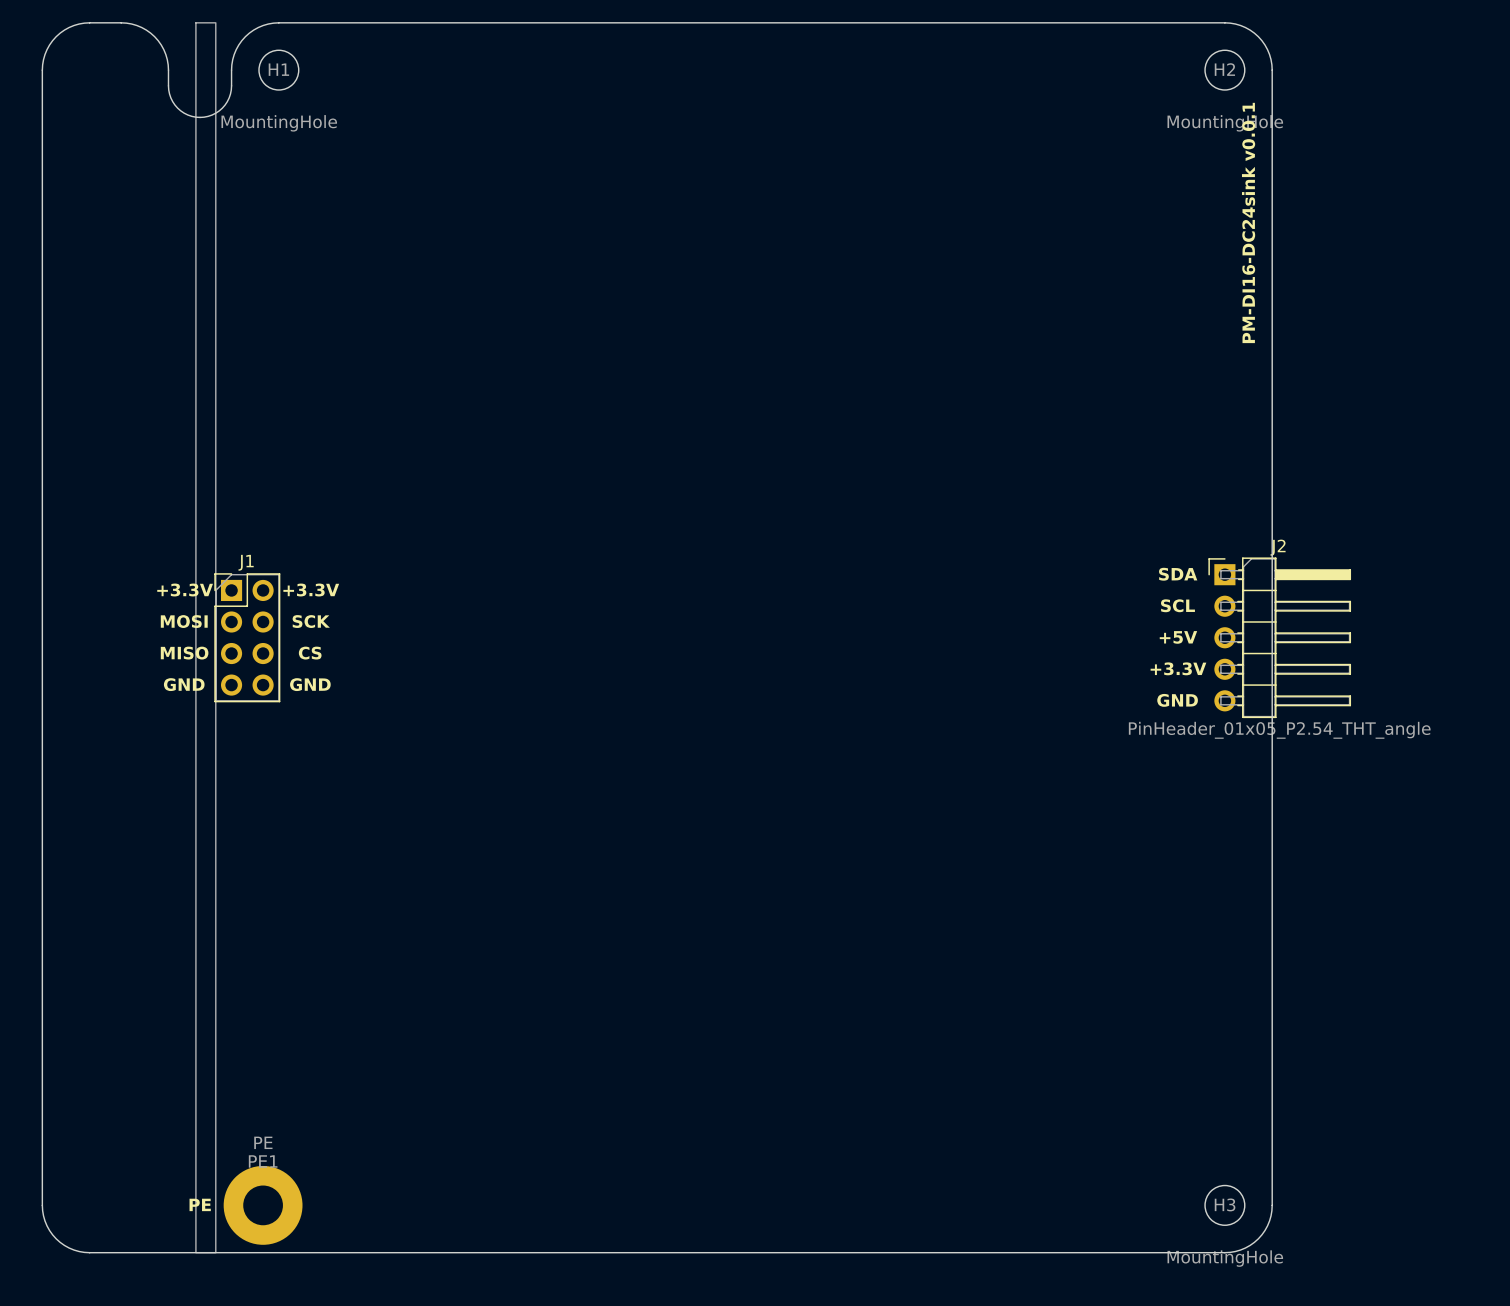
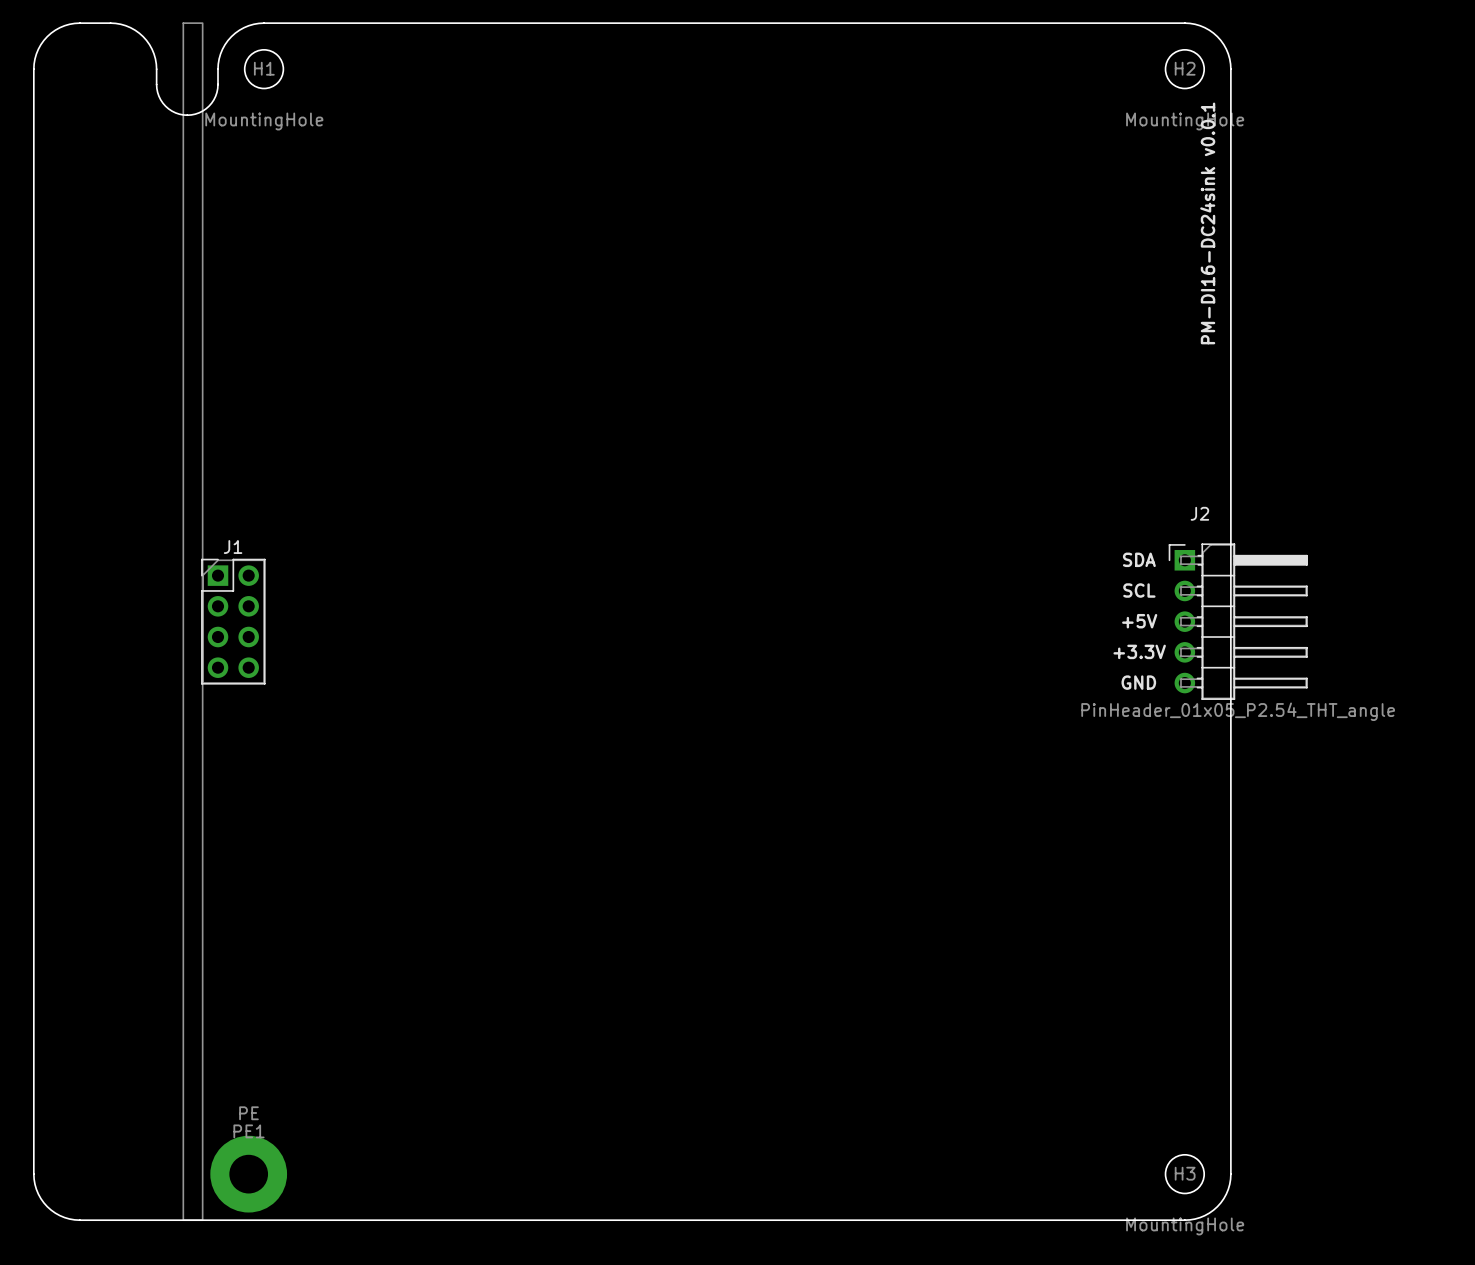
J2 name position: J2 (1278, 547) -> J2 (1199, 513)
text: +3.3V (185, 590) -> none
text: +3.3V (311, 590) -> none
text: MOSI (184, 621) -> none
text: SCK (311, 621) -> none
text: MISO (184, 653) -> none
text: CS (310, 653) -> none
text: GND (184, 684) -> none
text: GND (310, 684) -> none
text: PE (200, 1204) -> none

